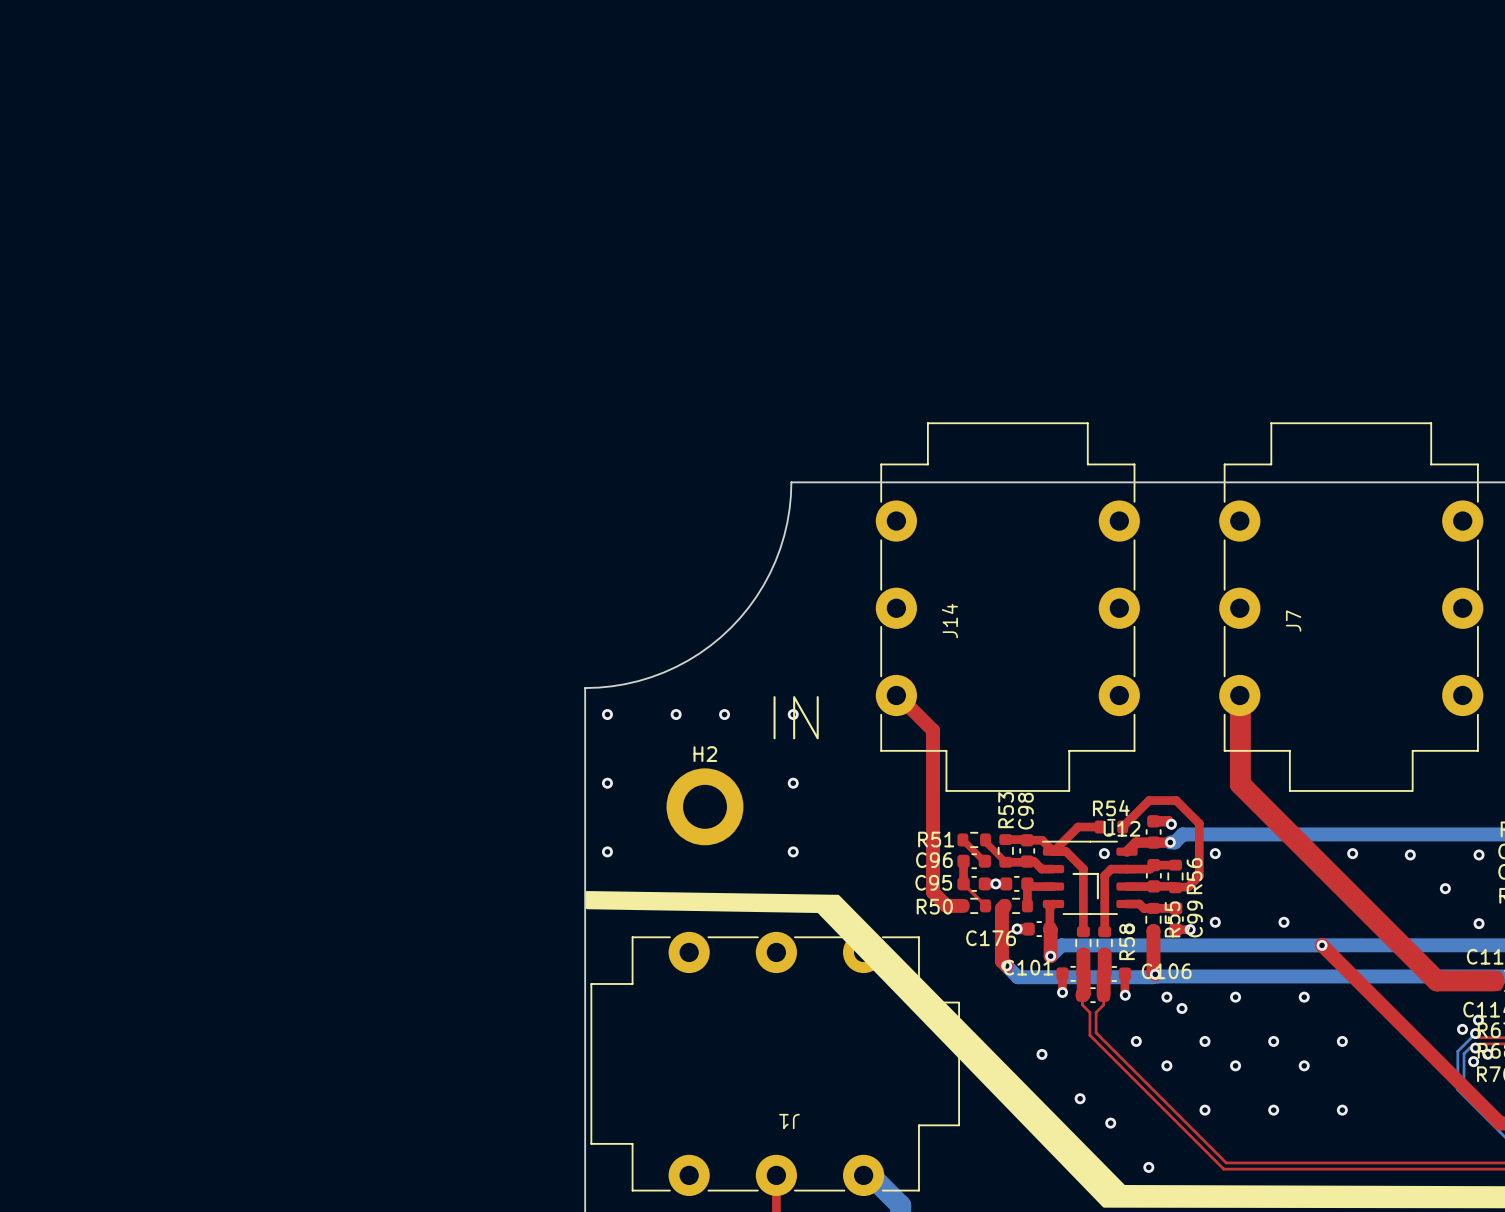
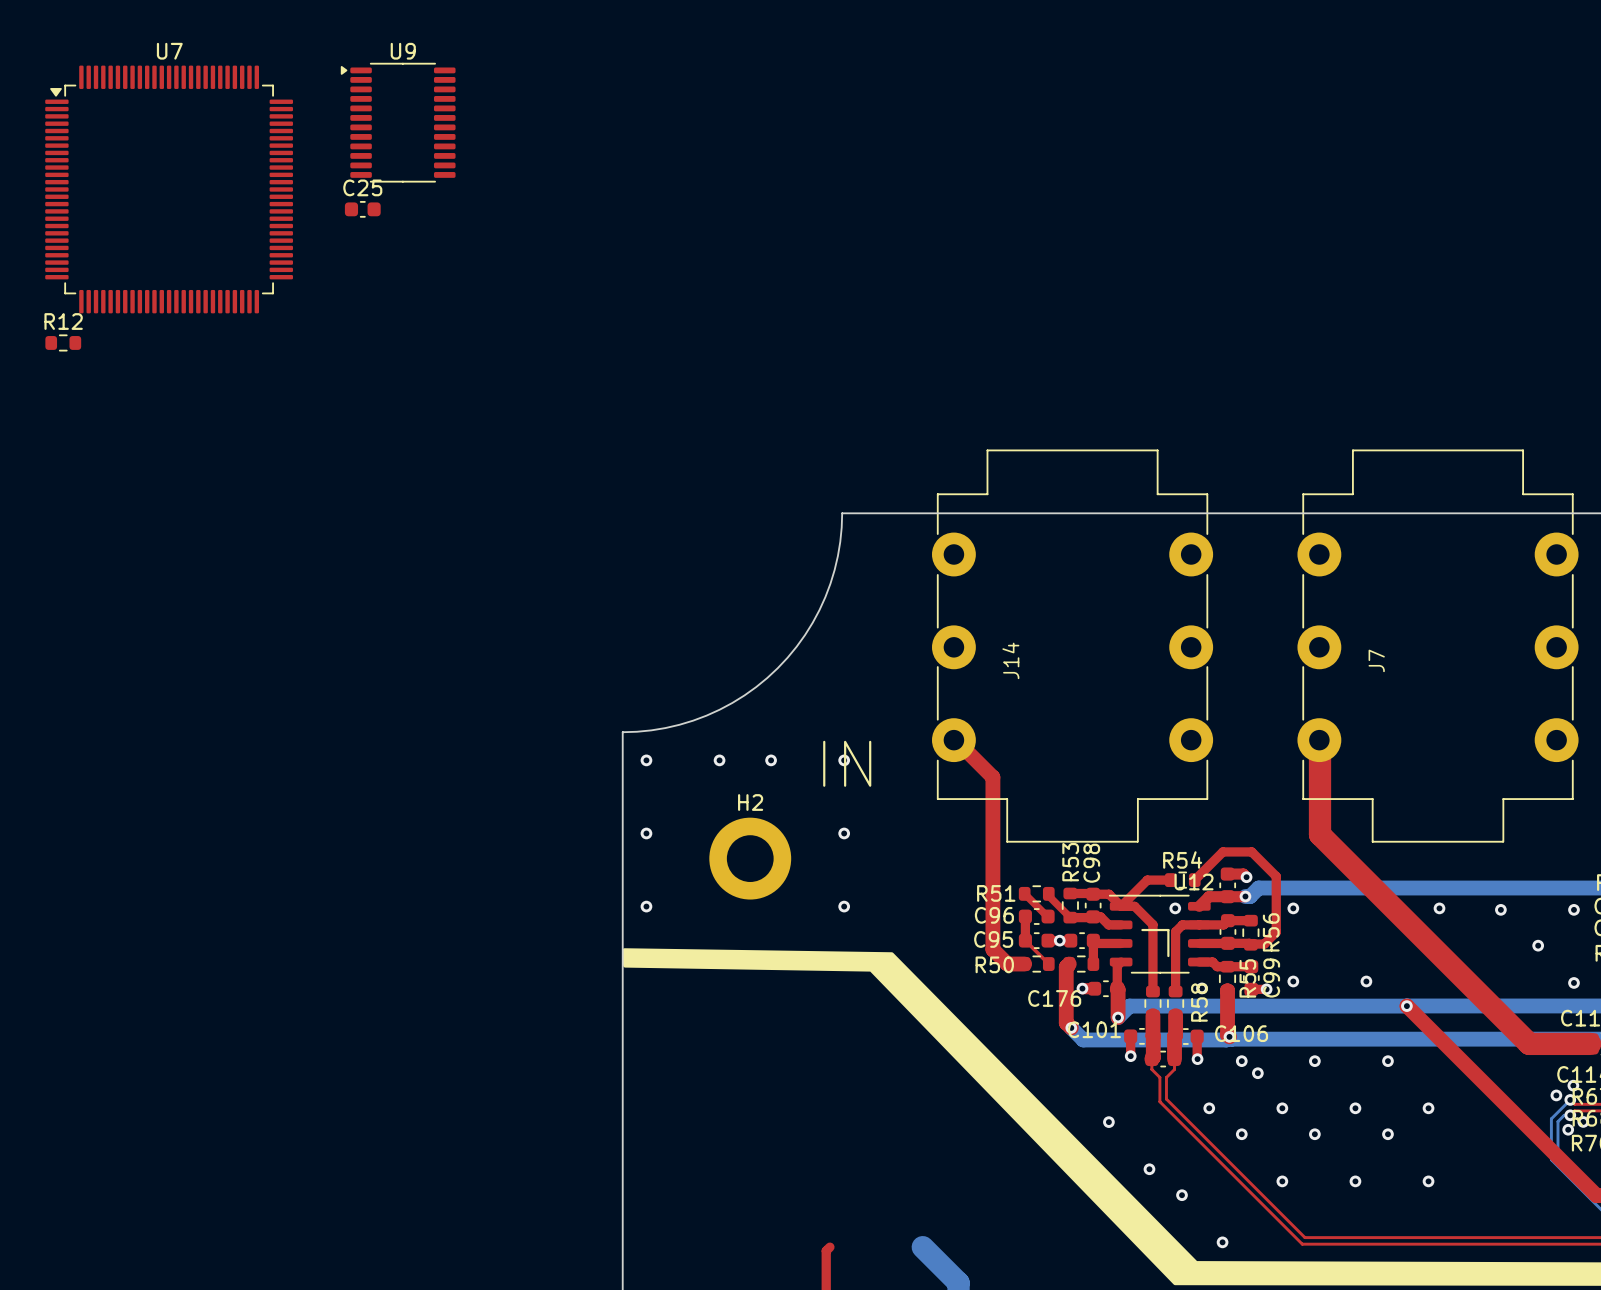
U9: none -> (398, 122)
U7: none -> (169, 189)
C25: none -> (362, 209)
R12: none -> (63, 342)
J1: (775, 1063) -> none

